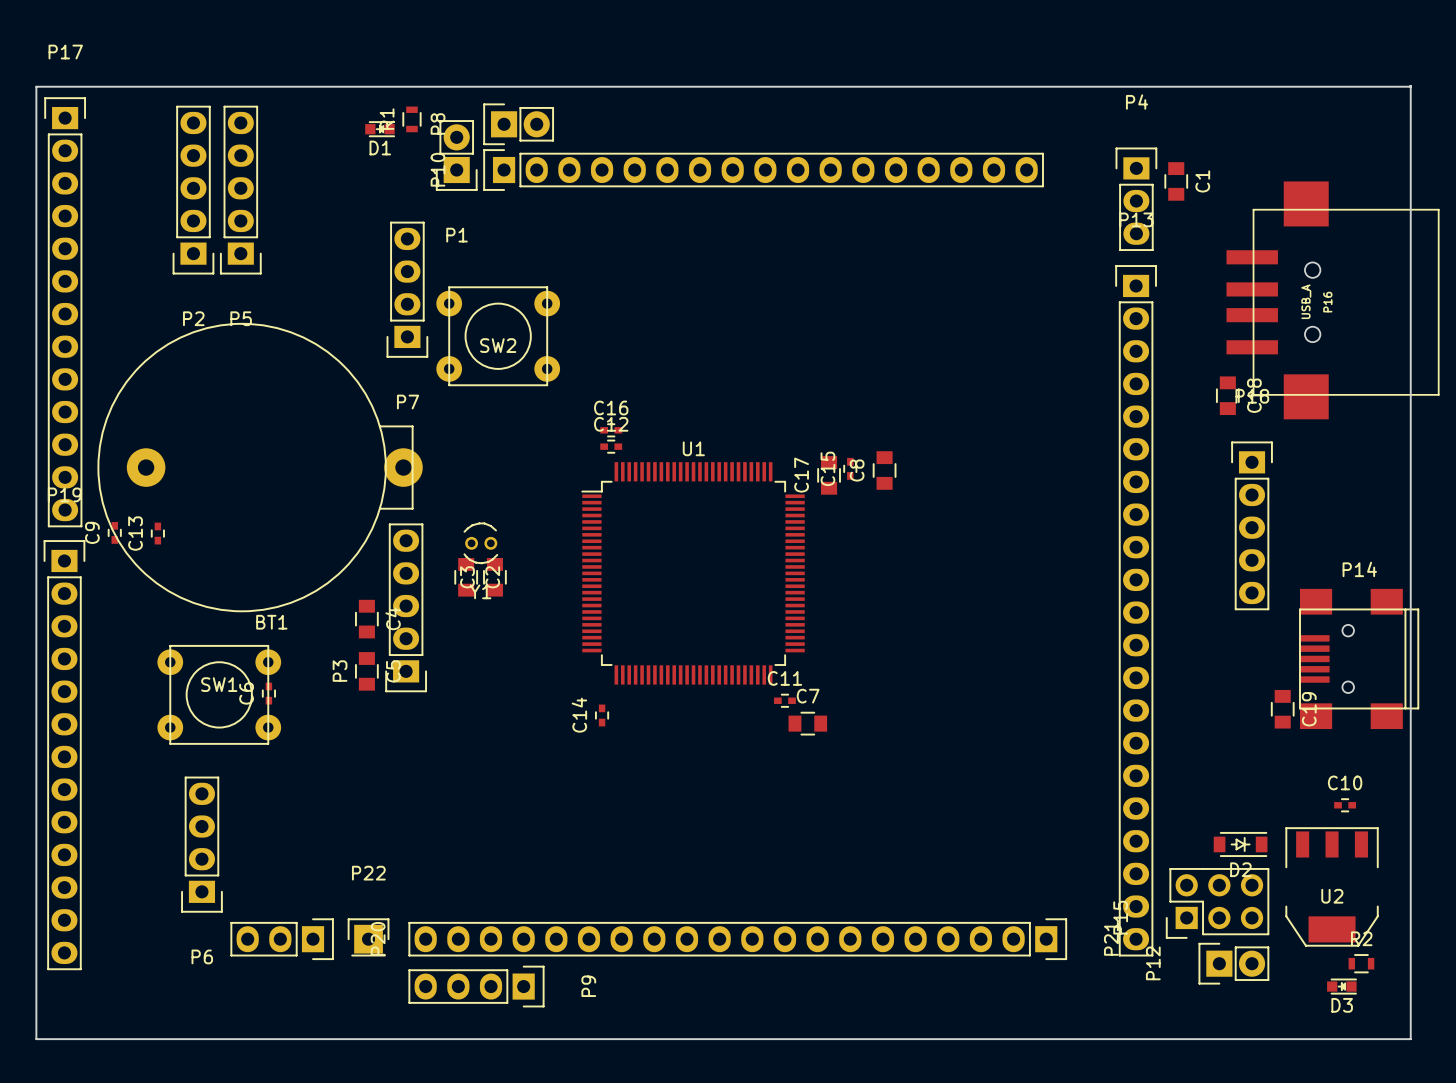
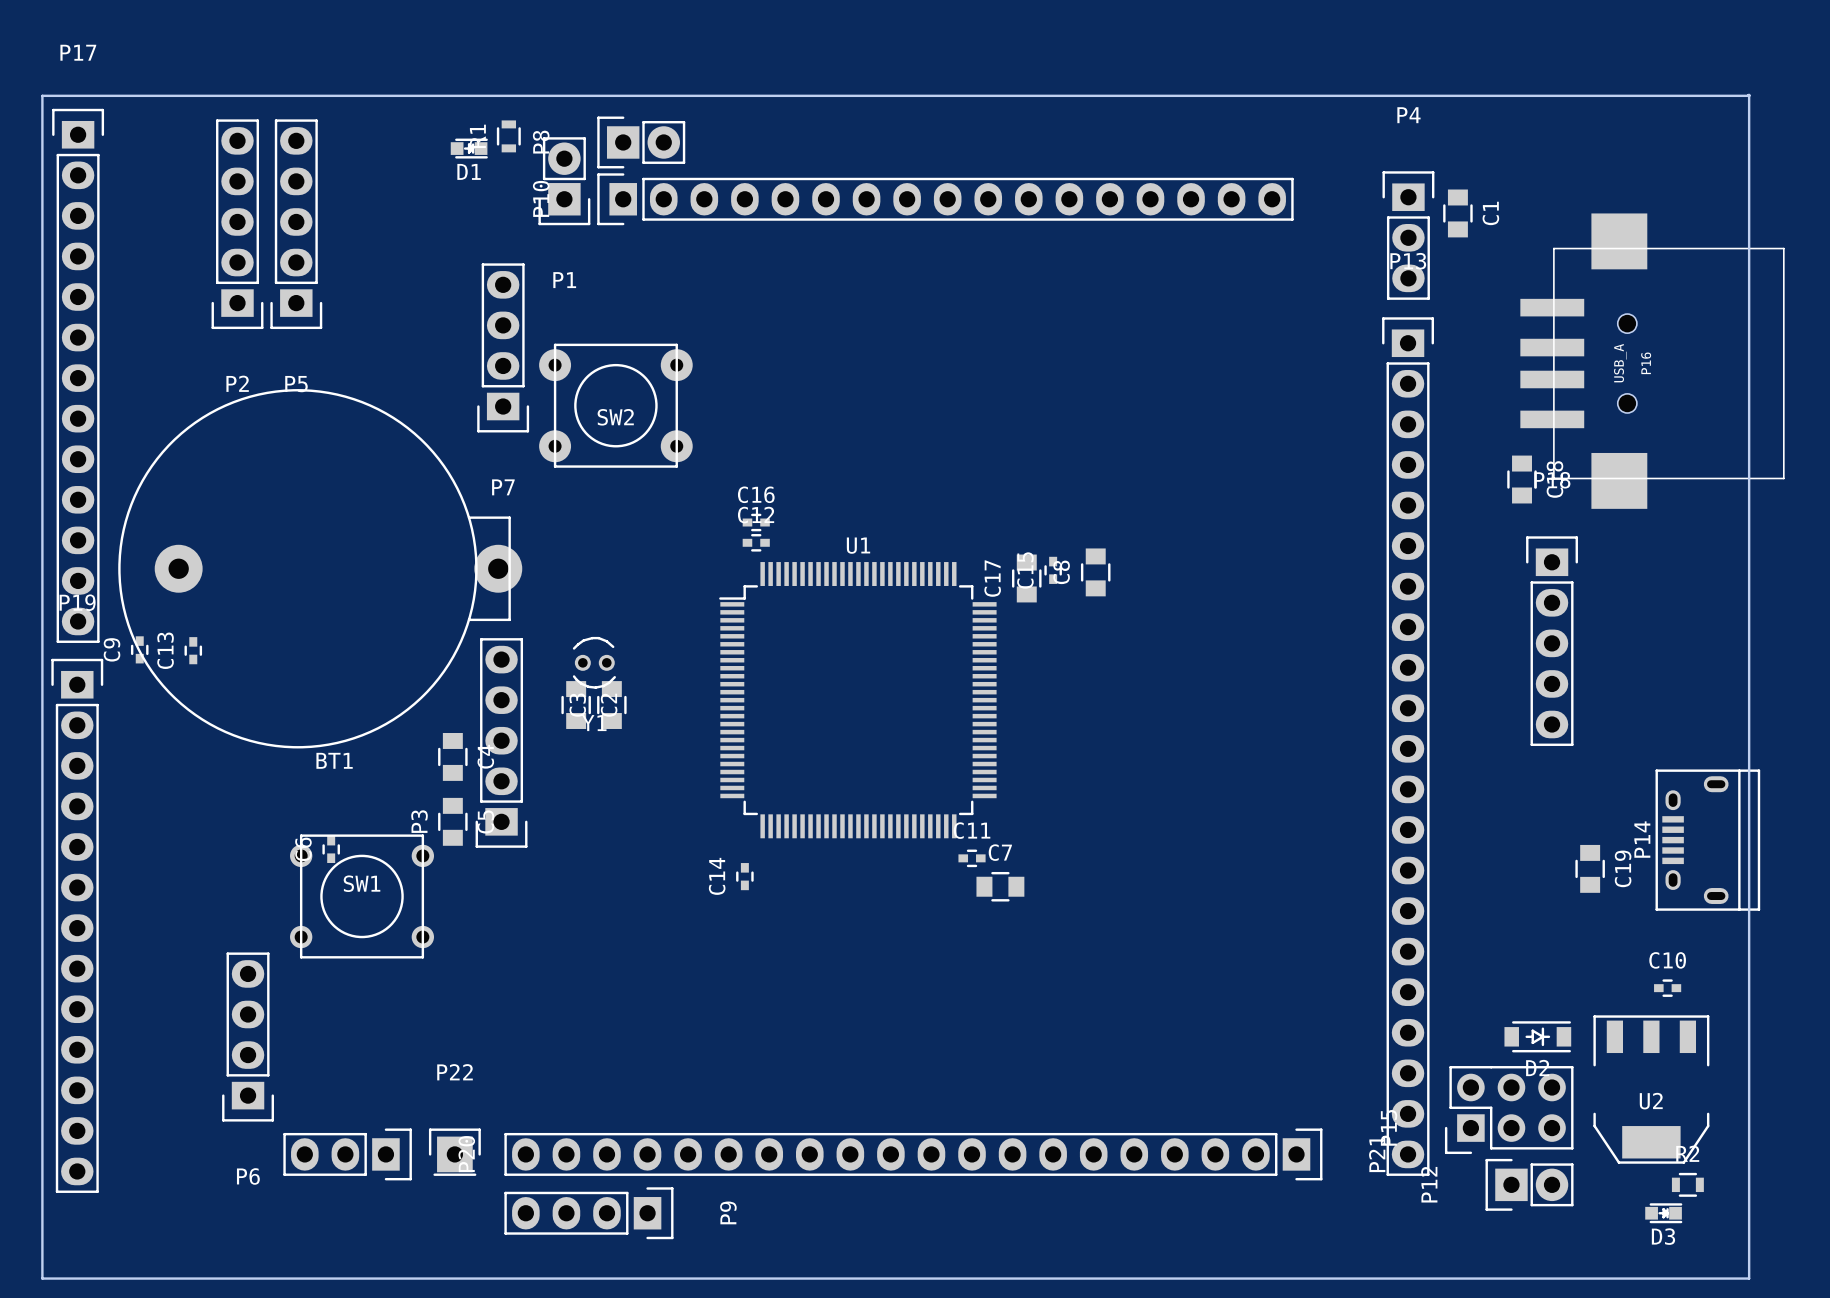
P14 name position: P14 (1359, 569) -> P14 (1642, 839)
P14 footprint: [1299, 588, 1420, 730] -> [1655, 769, 1761, 911]
SW1 footprint: [157, 644, 282, 745] -> [290, 834, 435, 959]

